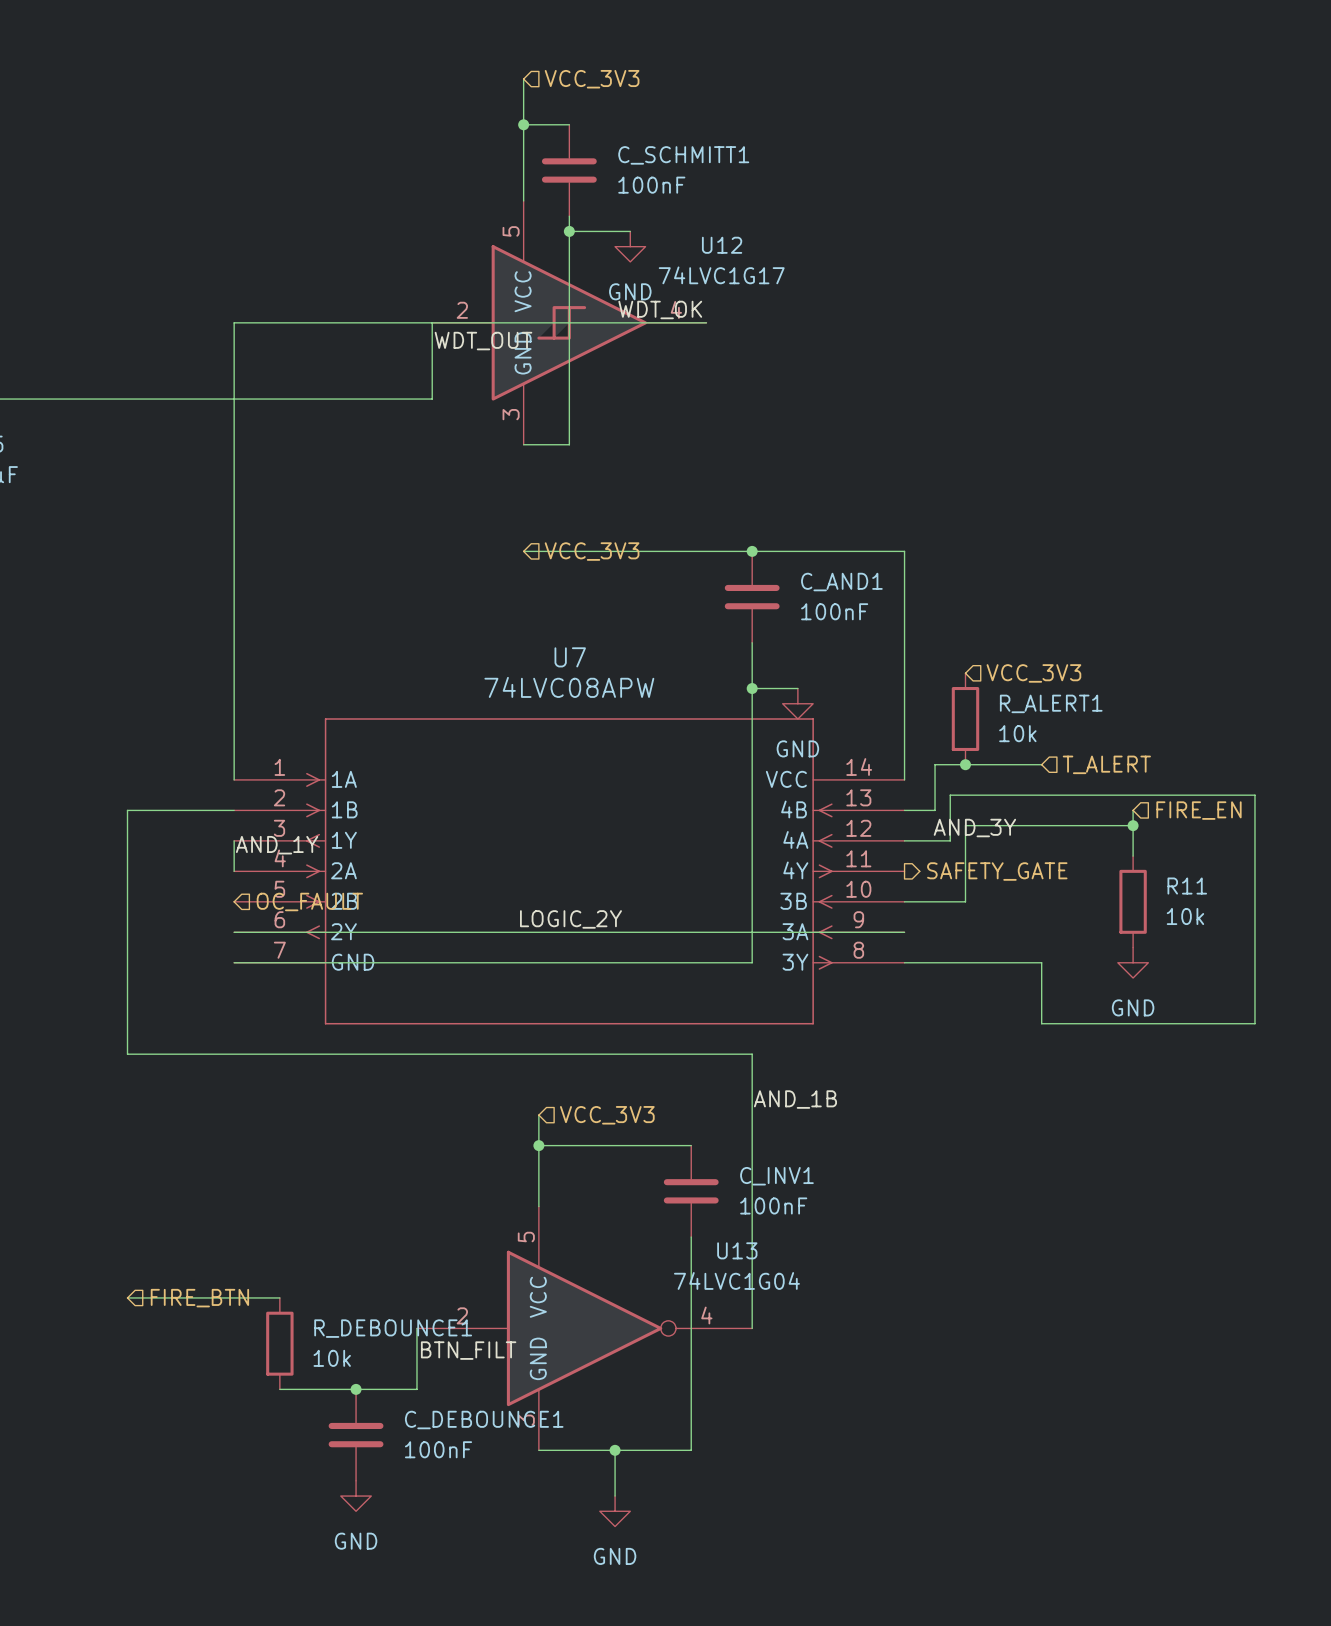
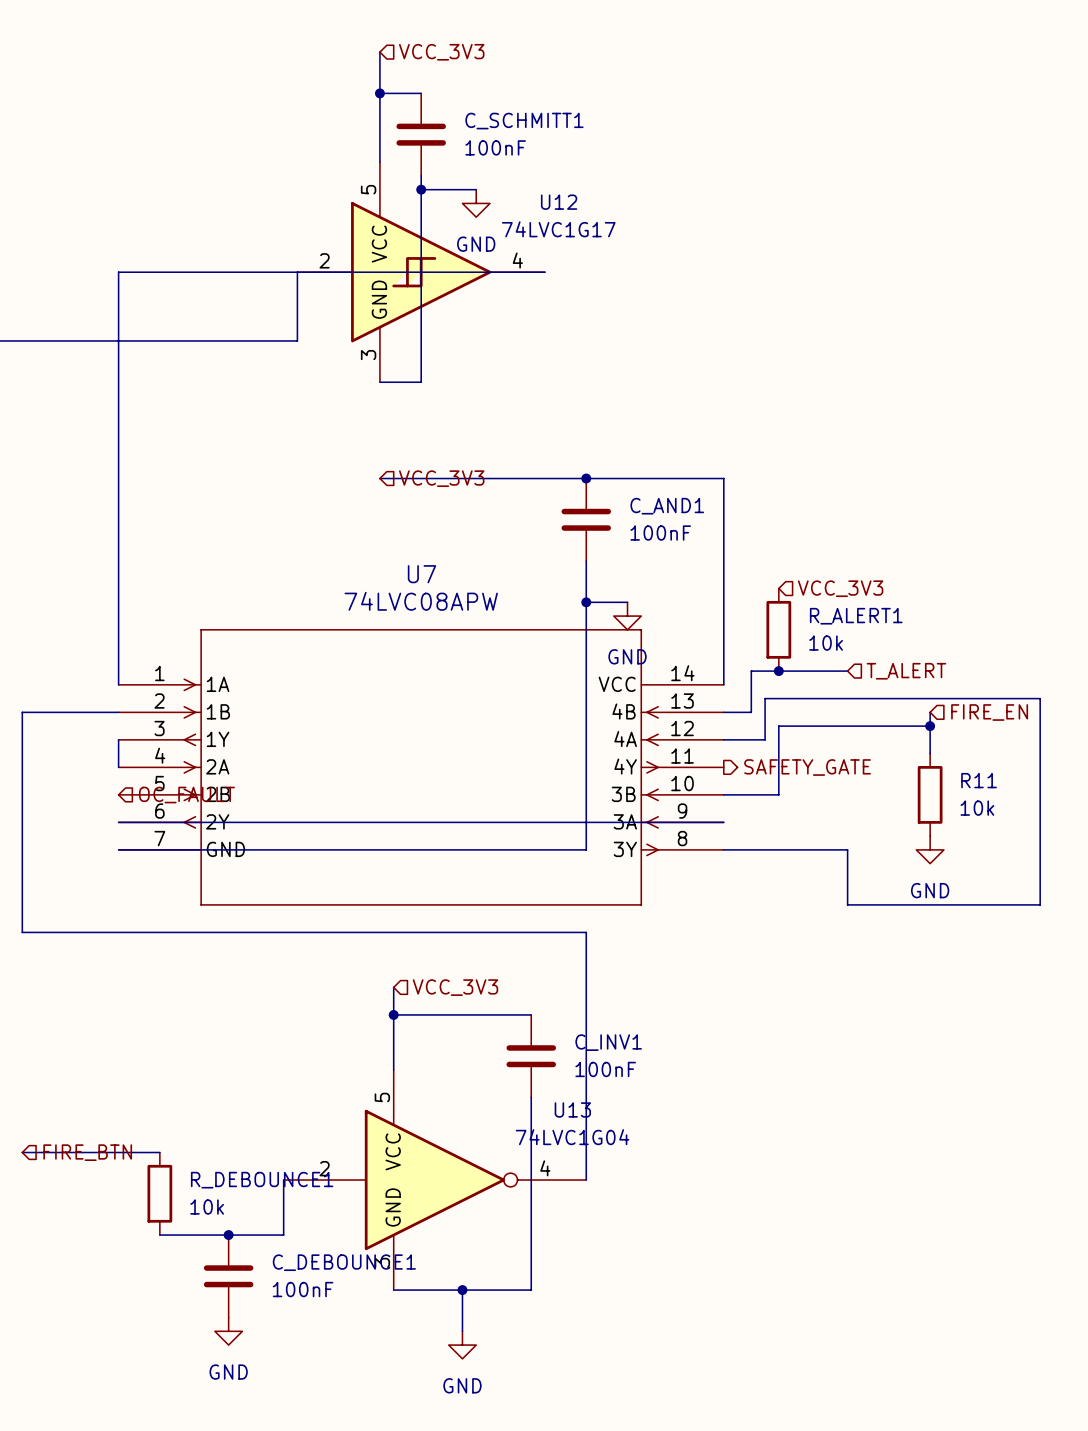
label: WDT_OK (660, 309) -> none
label: WDT_OUT (483, 341) -> none
label: AND_3Y (974, 828) -> none
label: AND_1Y (277, 845) -> none
label: LOGIC_2Y (570, 919) -> none
label: AND_1B (795, 1099) -> none
label: BTN_FILT (468, 1350) -> none

